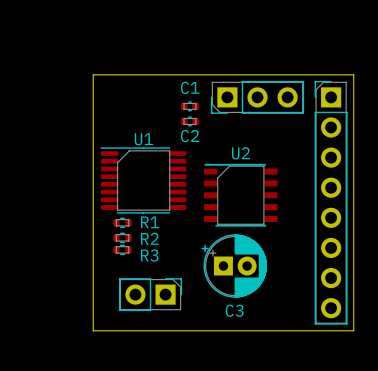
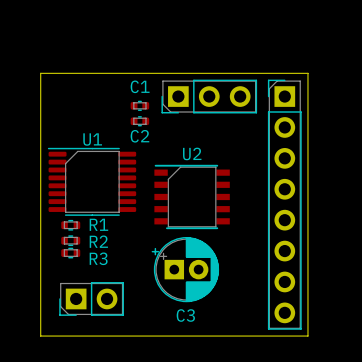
part rotation: 0° (150, 294) -> 180° (91, 298)

